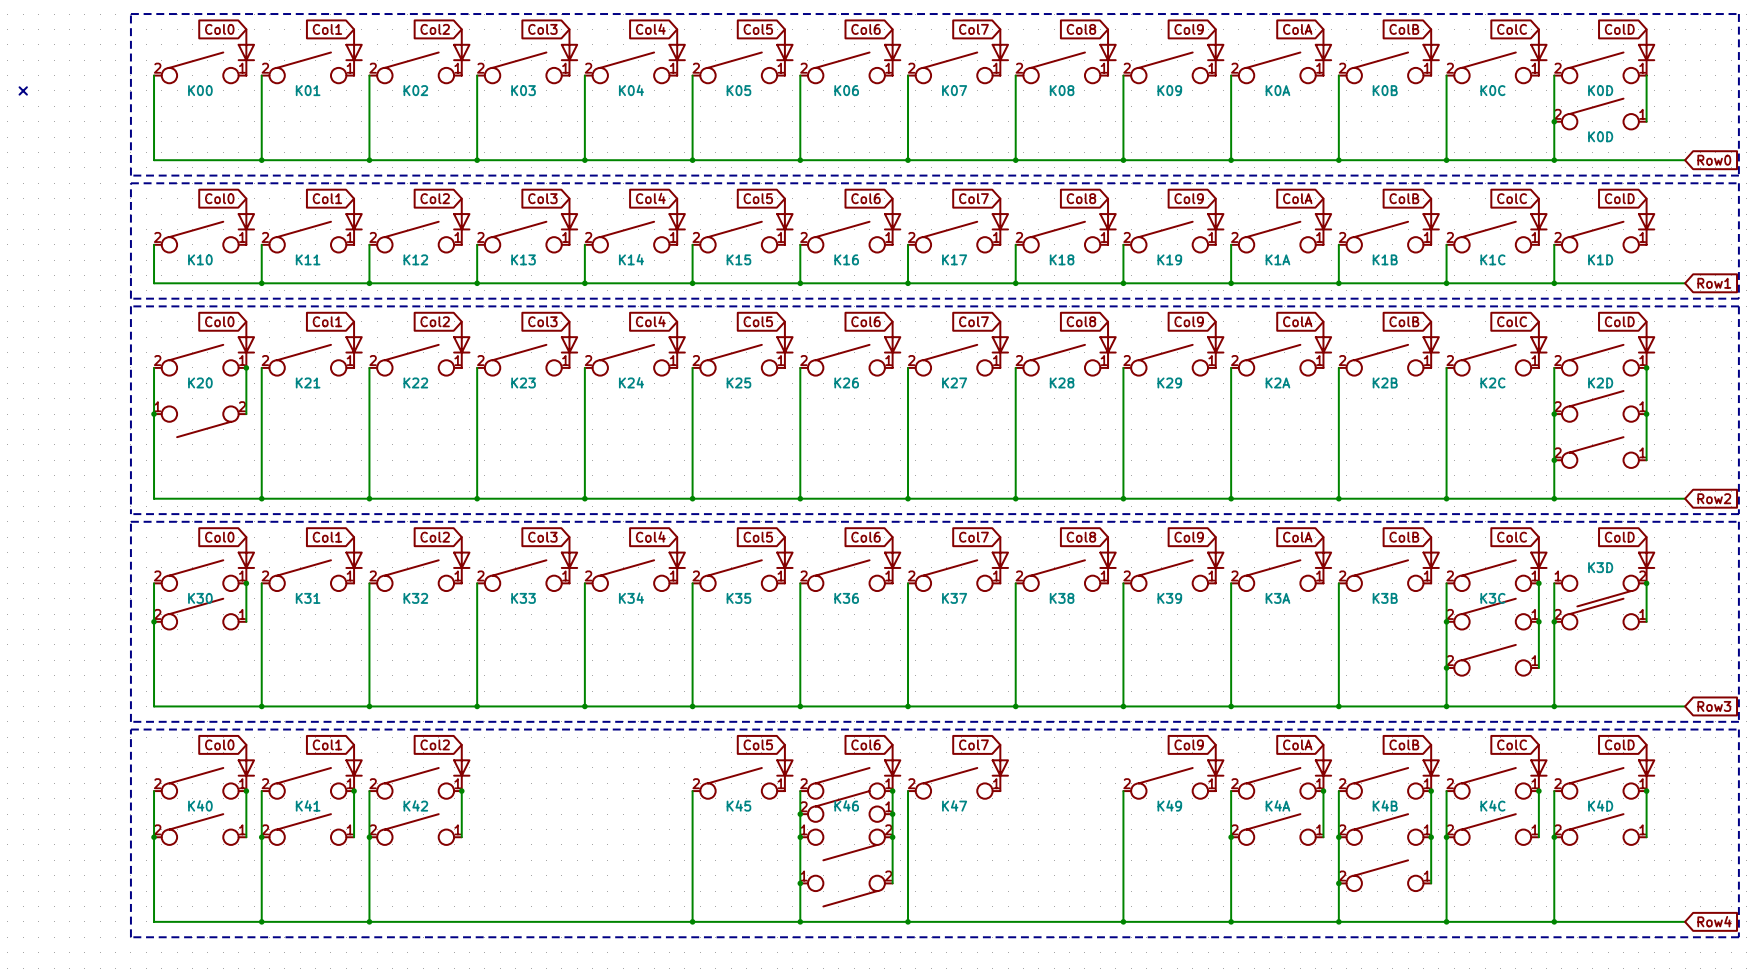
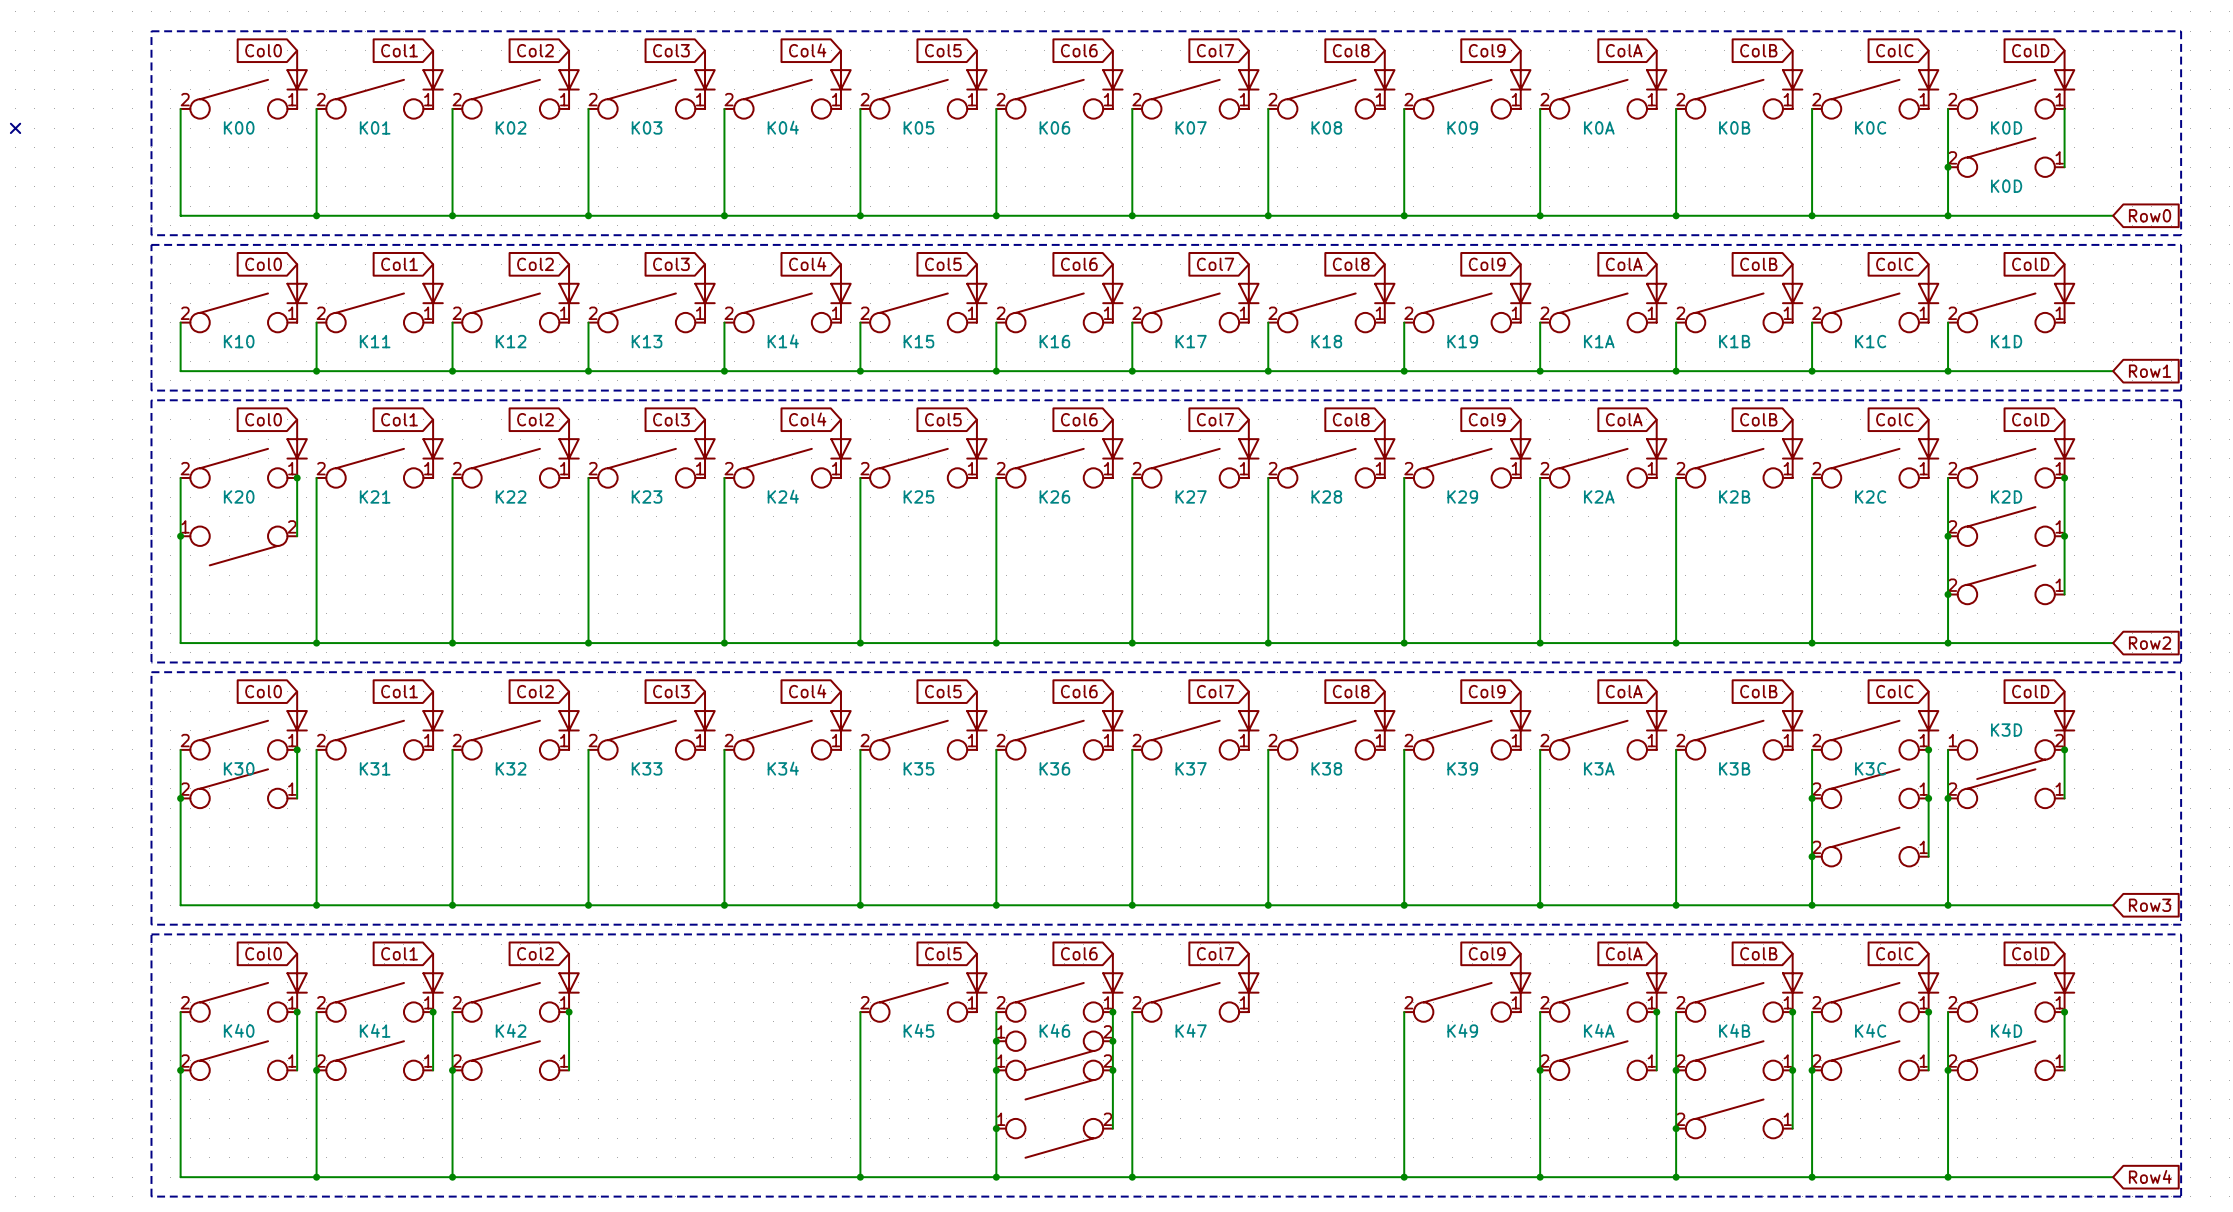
part rotation: 0° (846, 806) -> 180° (1054, 1051)

